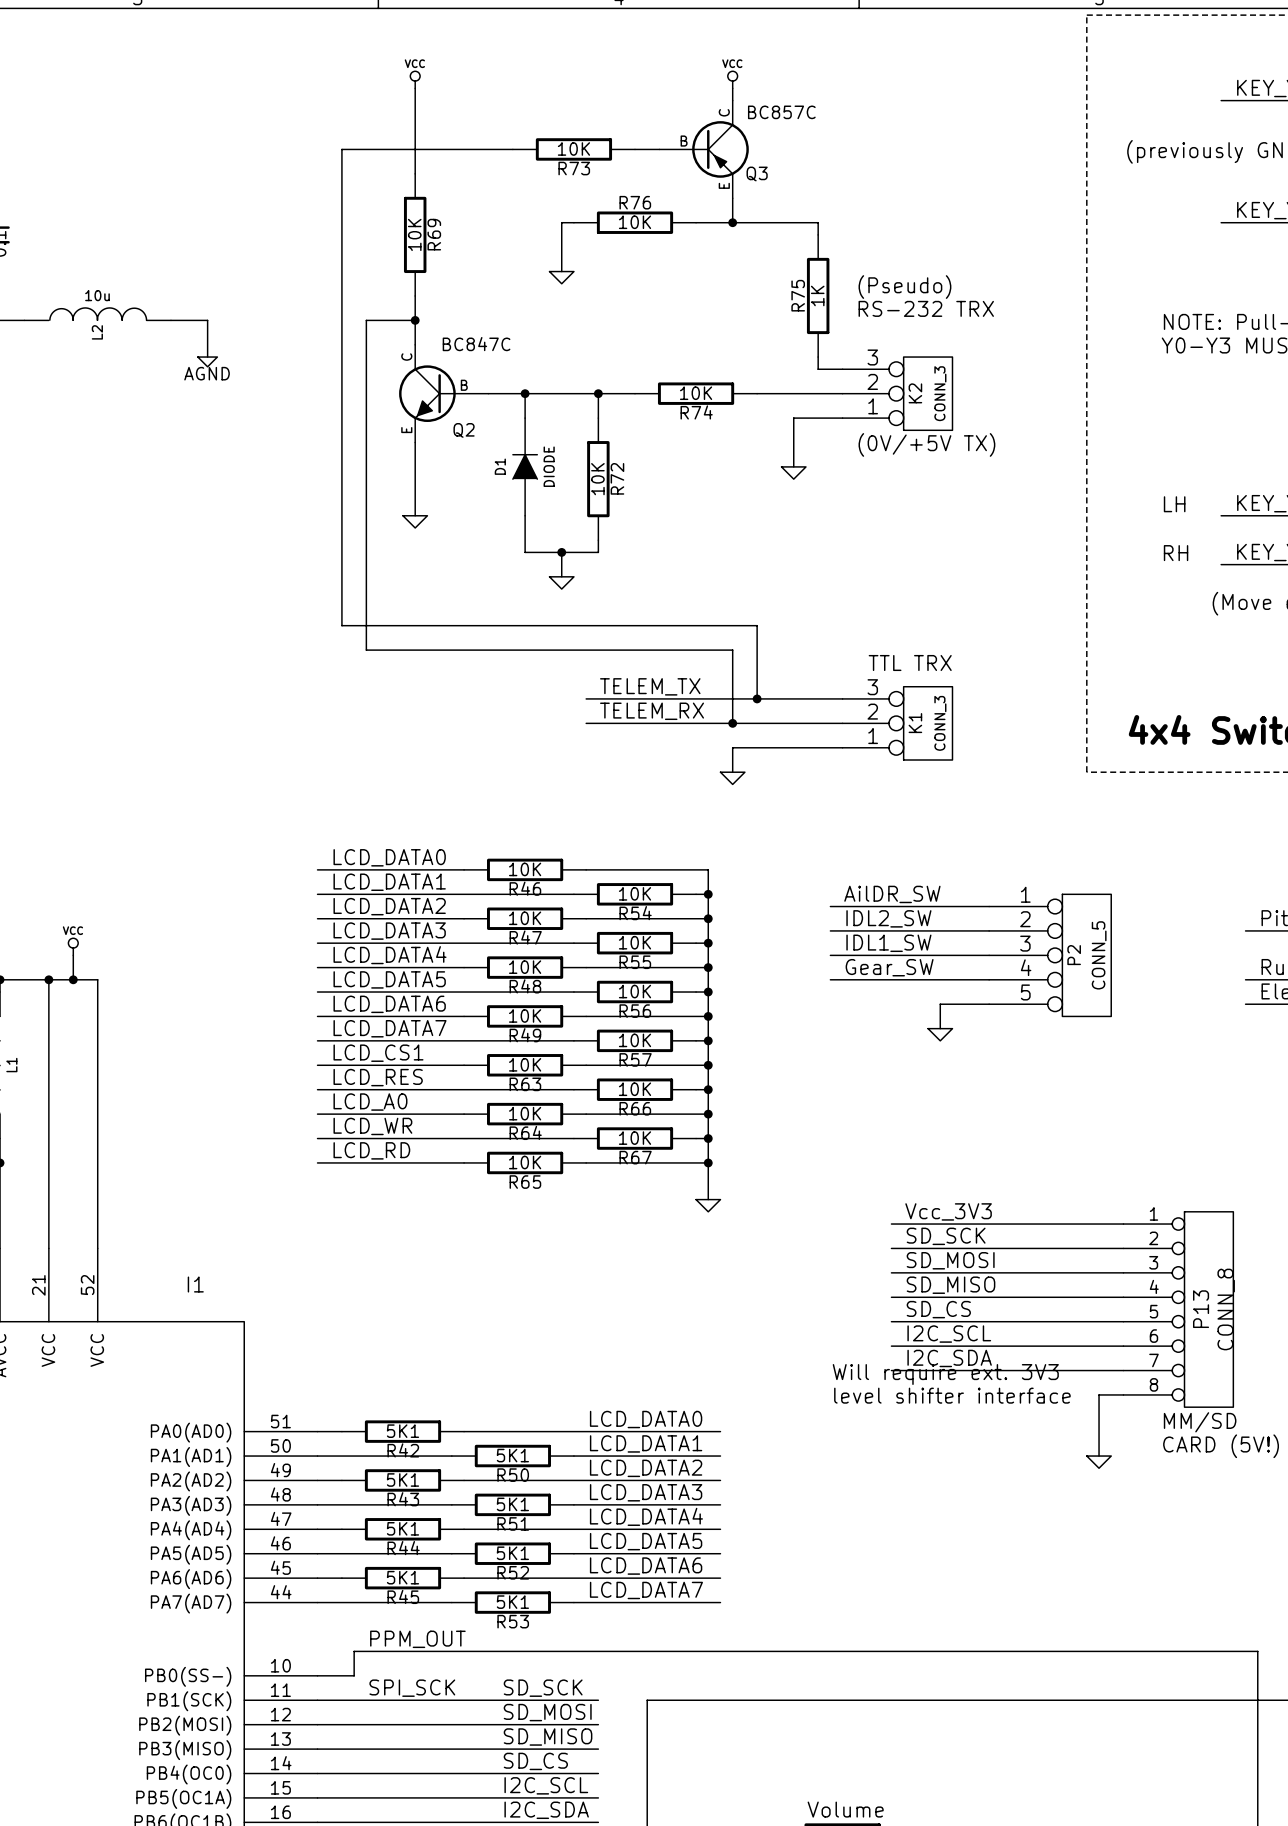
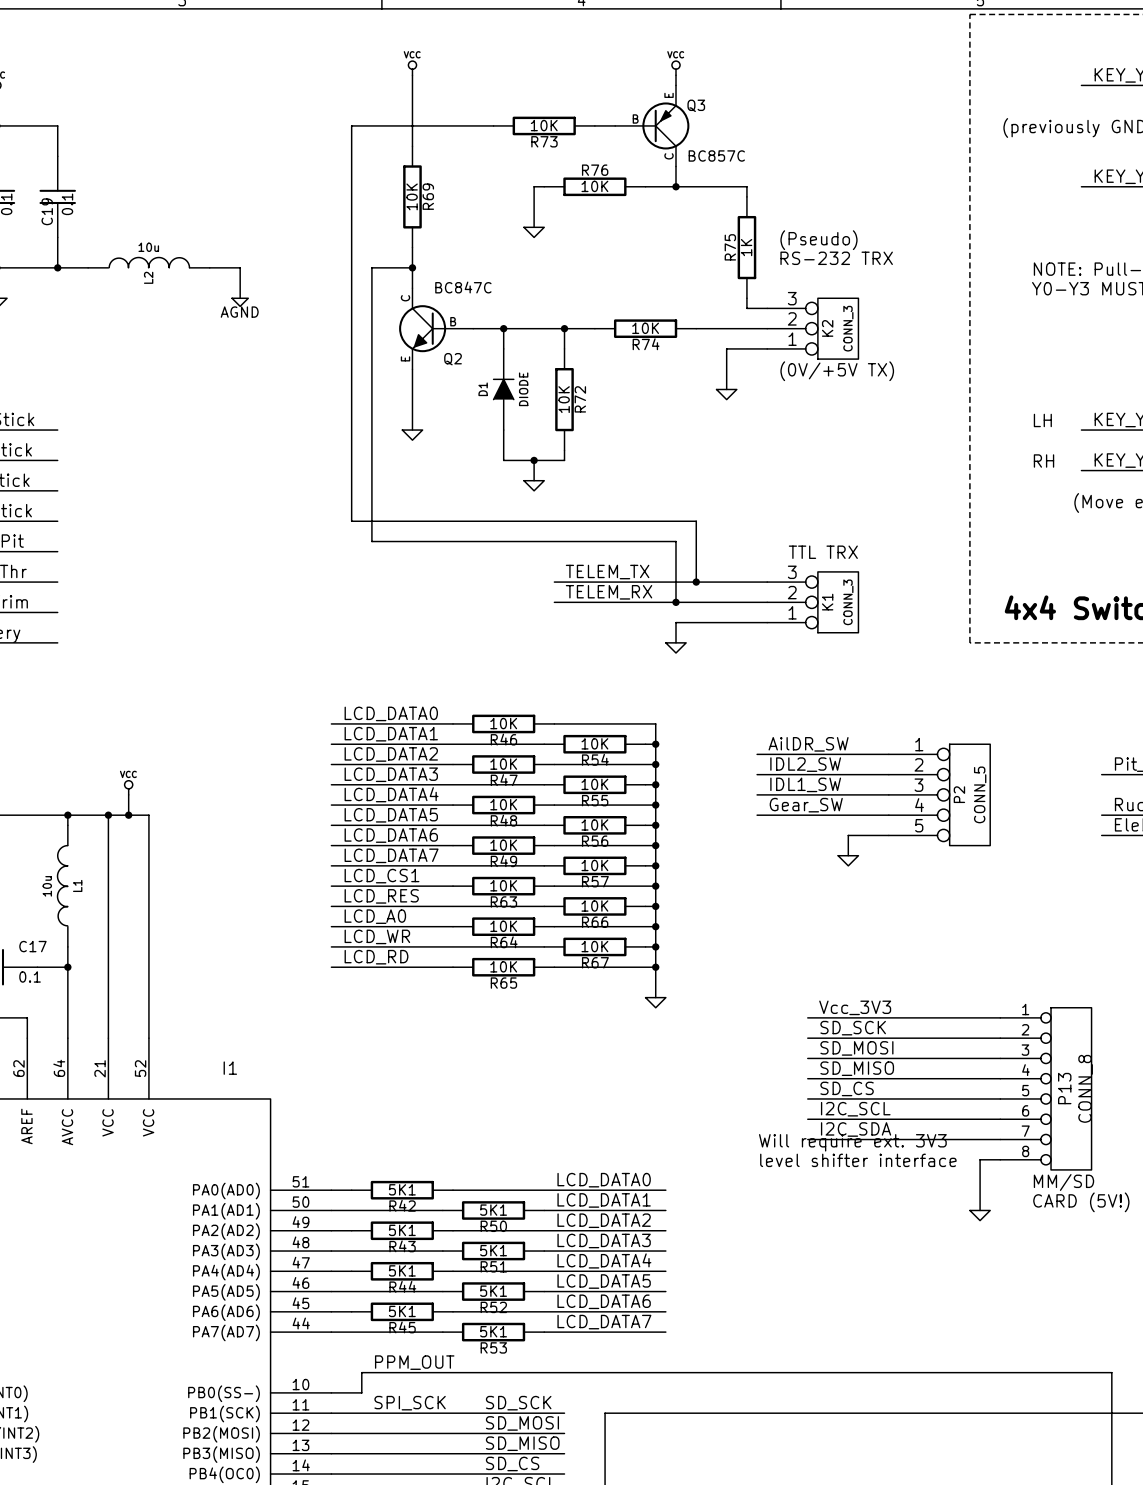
Q3 flip: as is (720, 149) -> up-down (665, 125)

